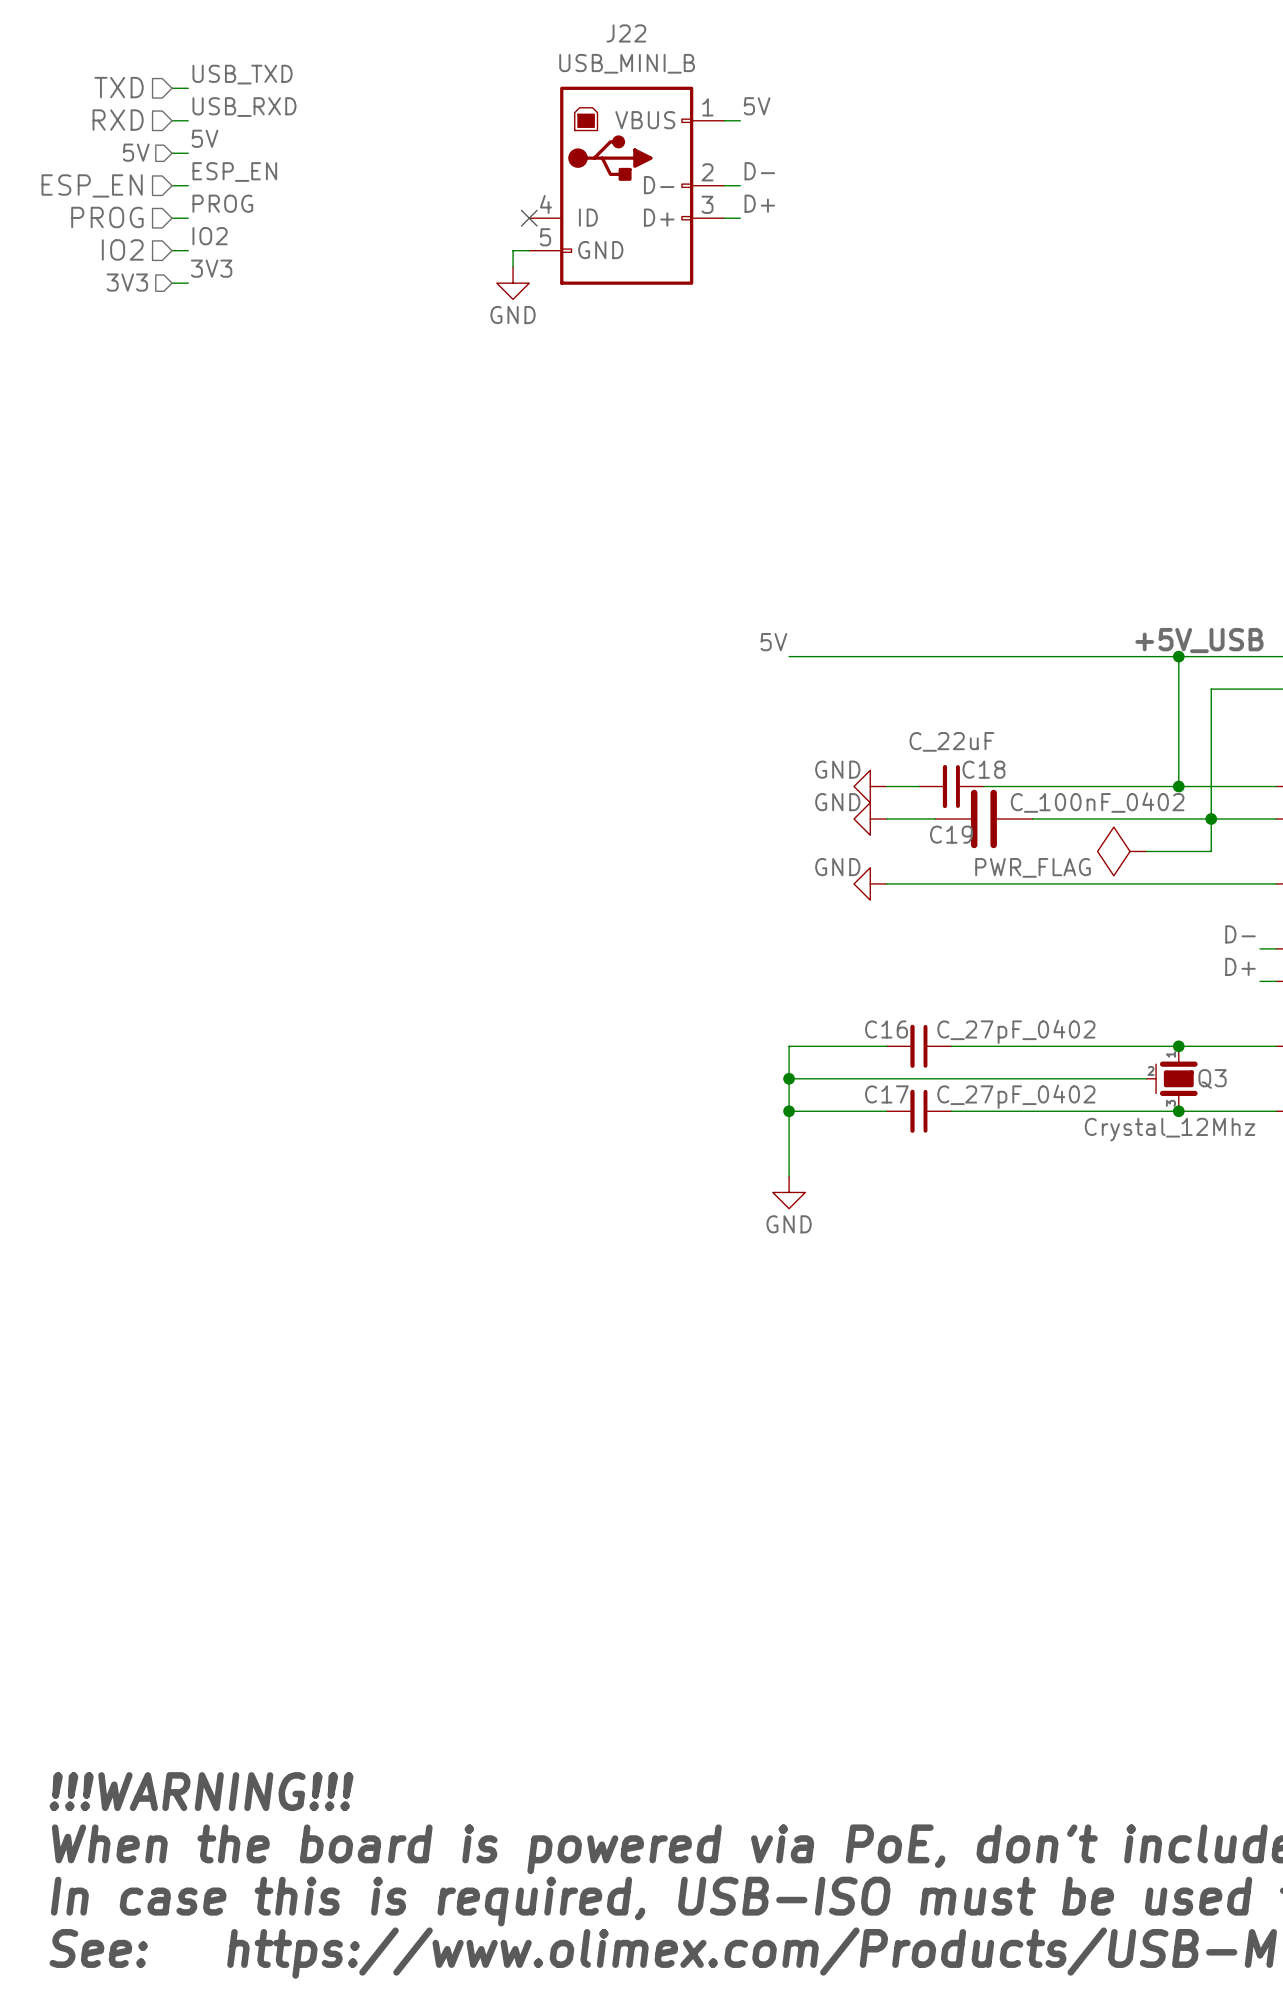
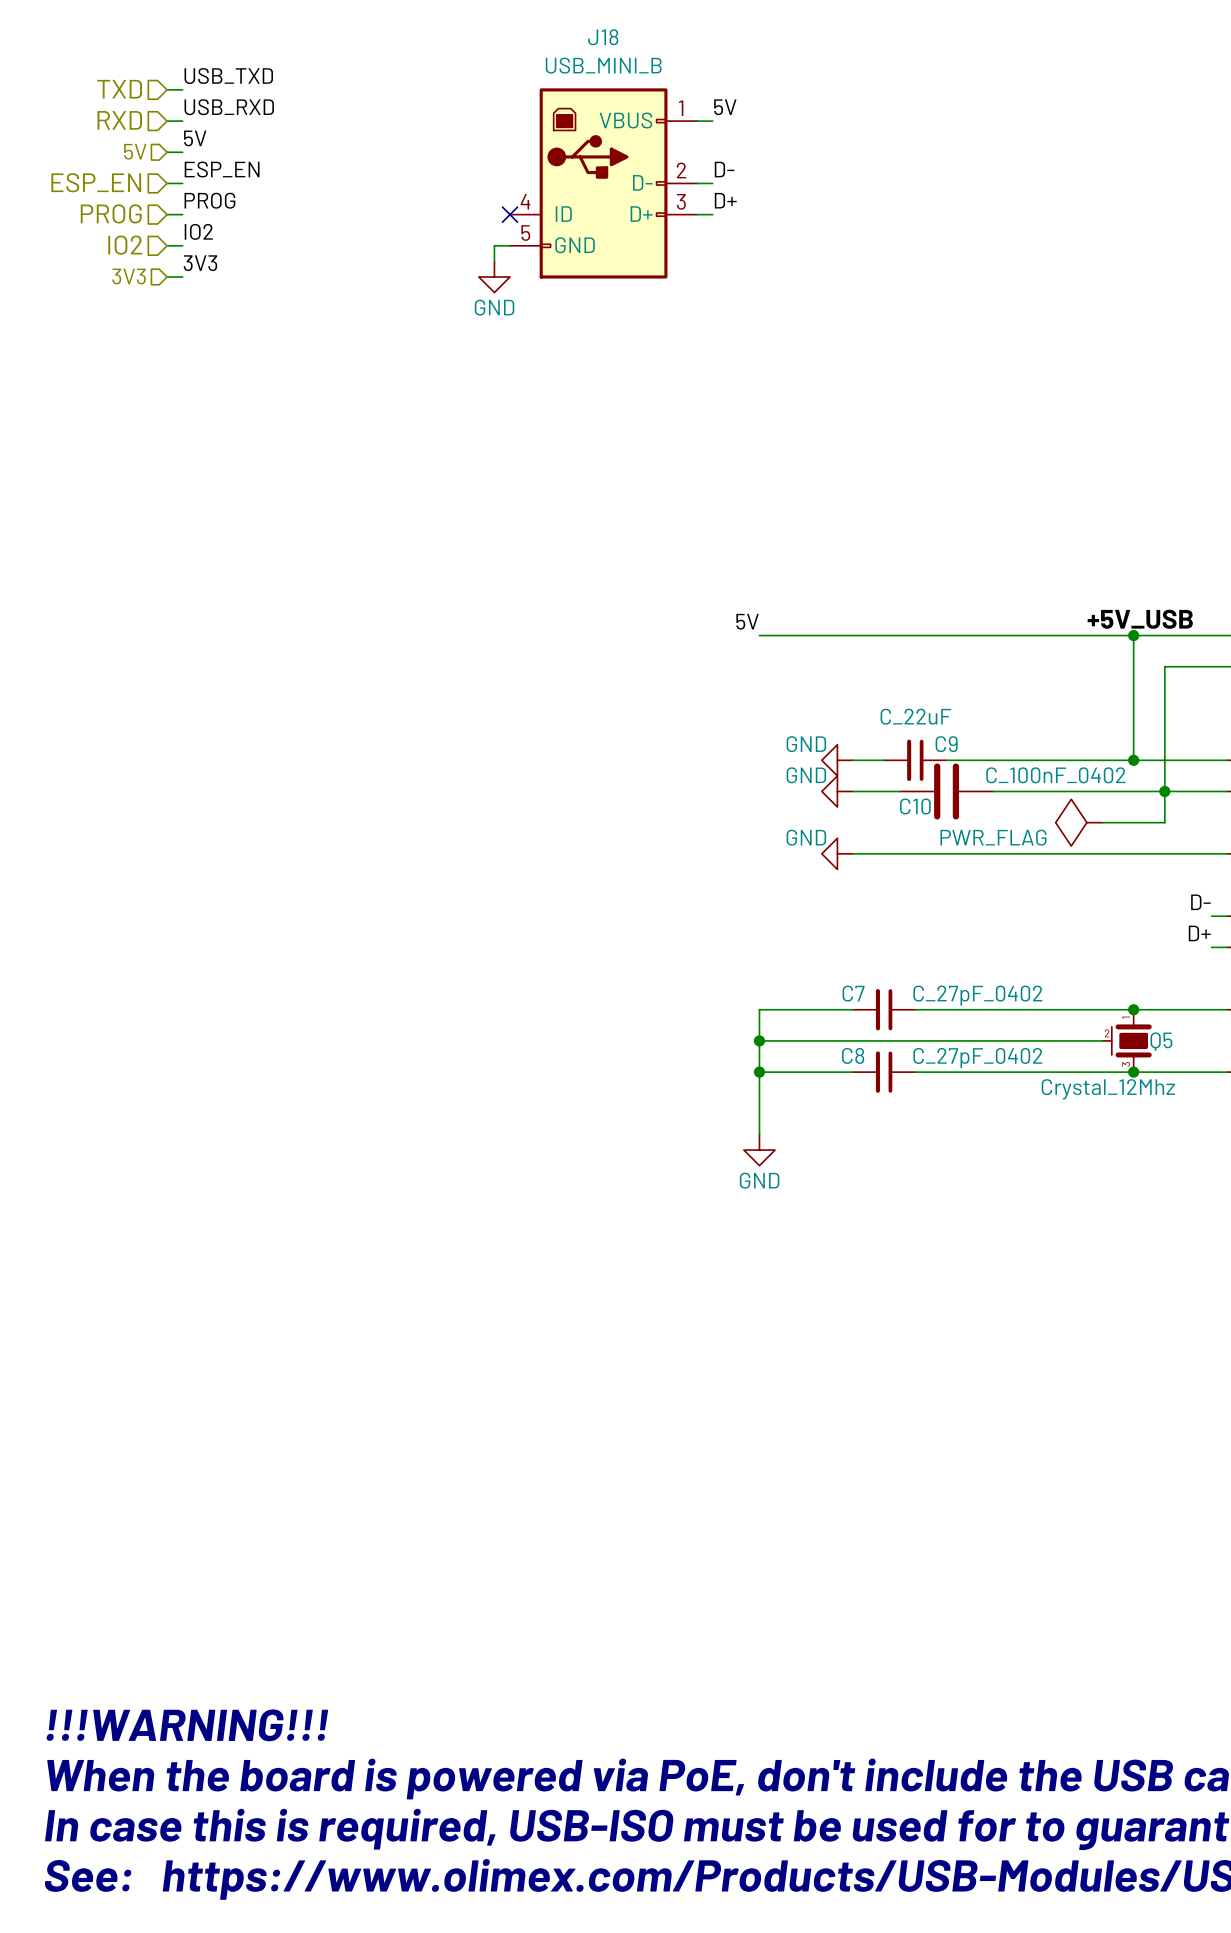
J22 name: J22 (626, 33) -> J18 (603, 37)
C18 name: C18 (983, 769) -> C9 (946, 744)
C19 name: C19 (951, 834) -> C10 (915, 806)
C16 name: C16 (886, 1029) -> C7 (853, 993)
Q3 name: Q3 (1212, 1078) -> Q5 (1161, 1041)
C17 name: C17 (886, 1094) -> C8 (853, 1055)

